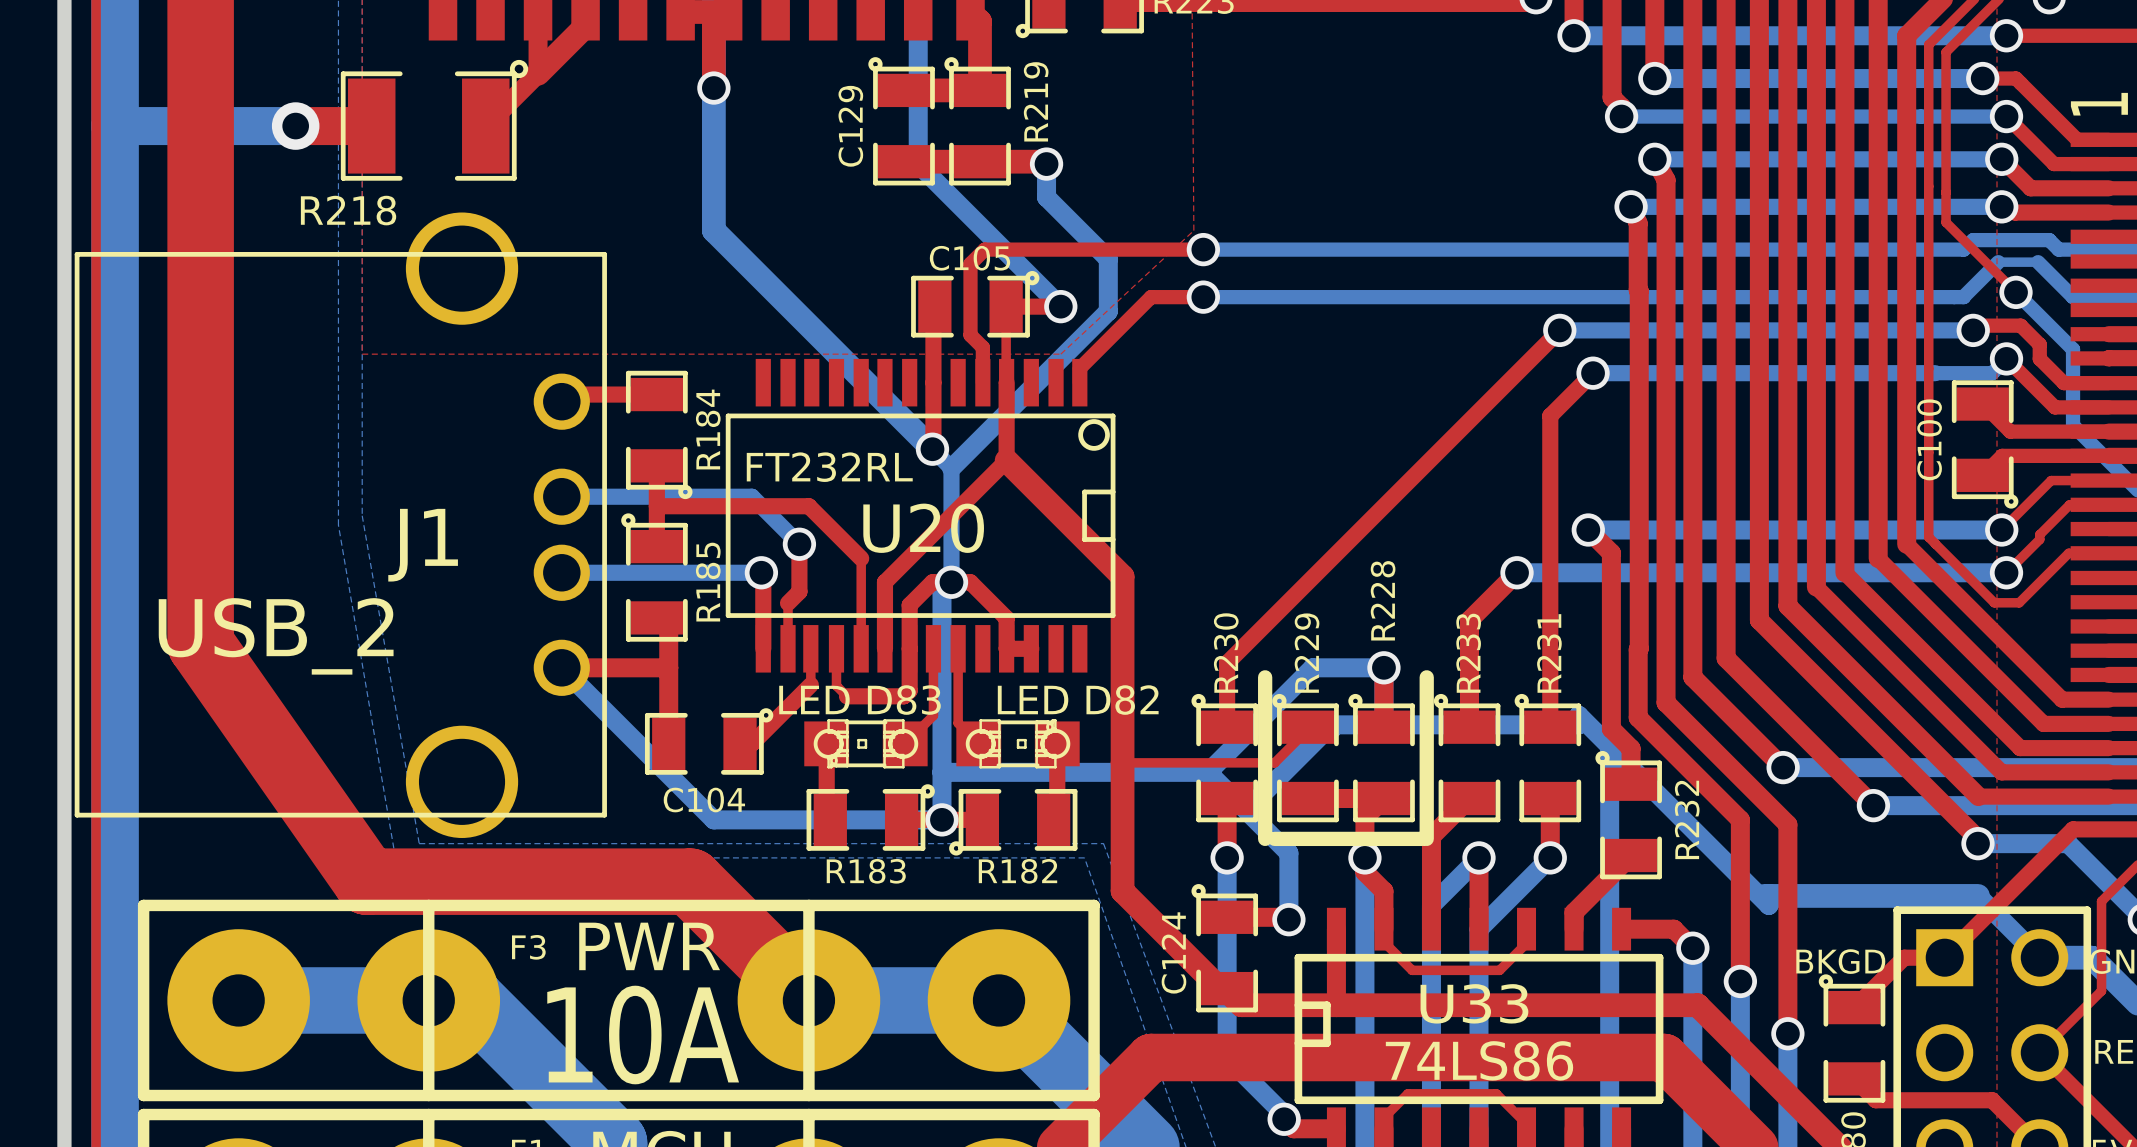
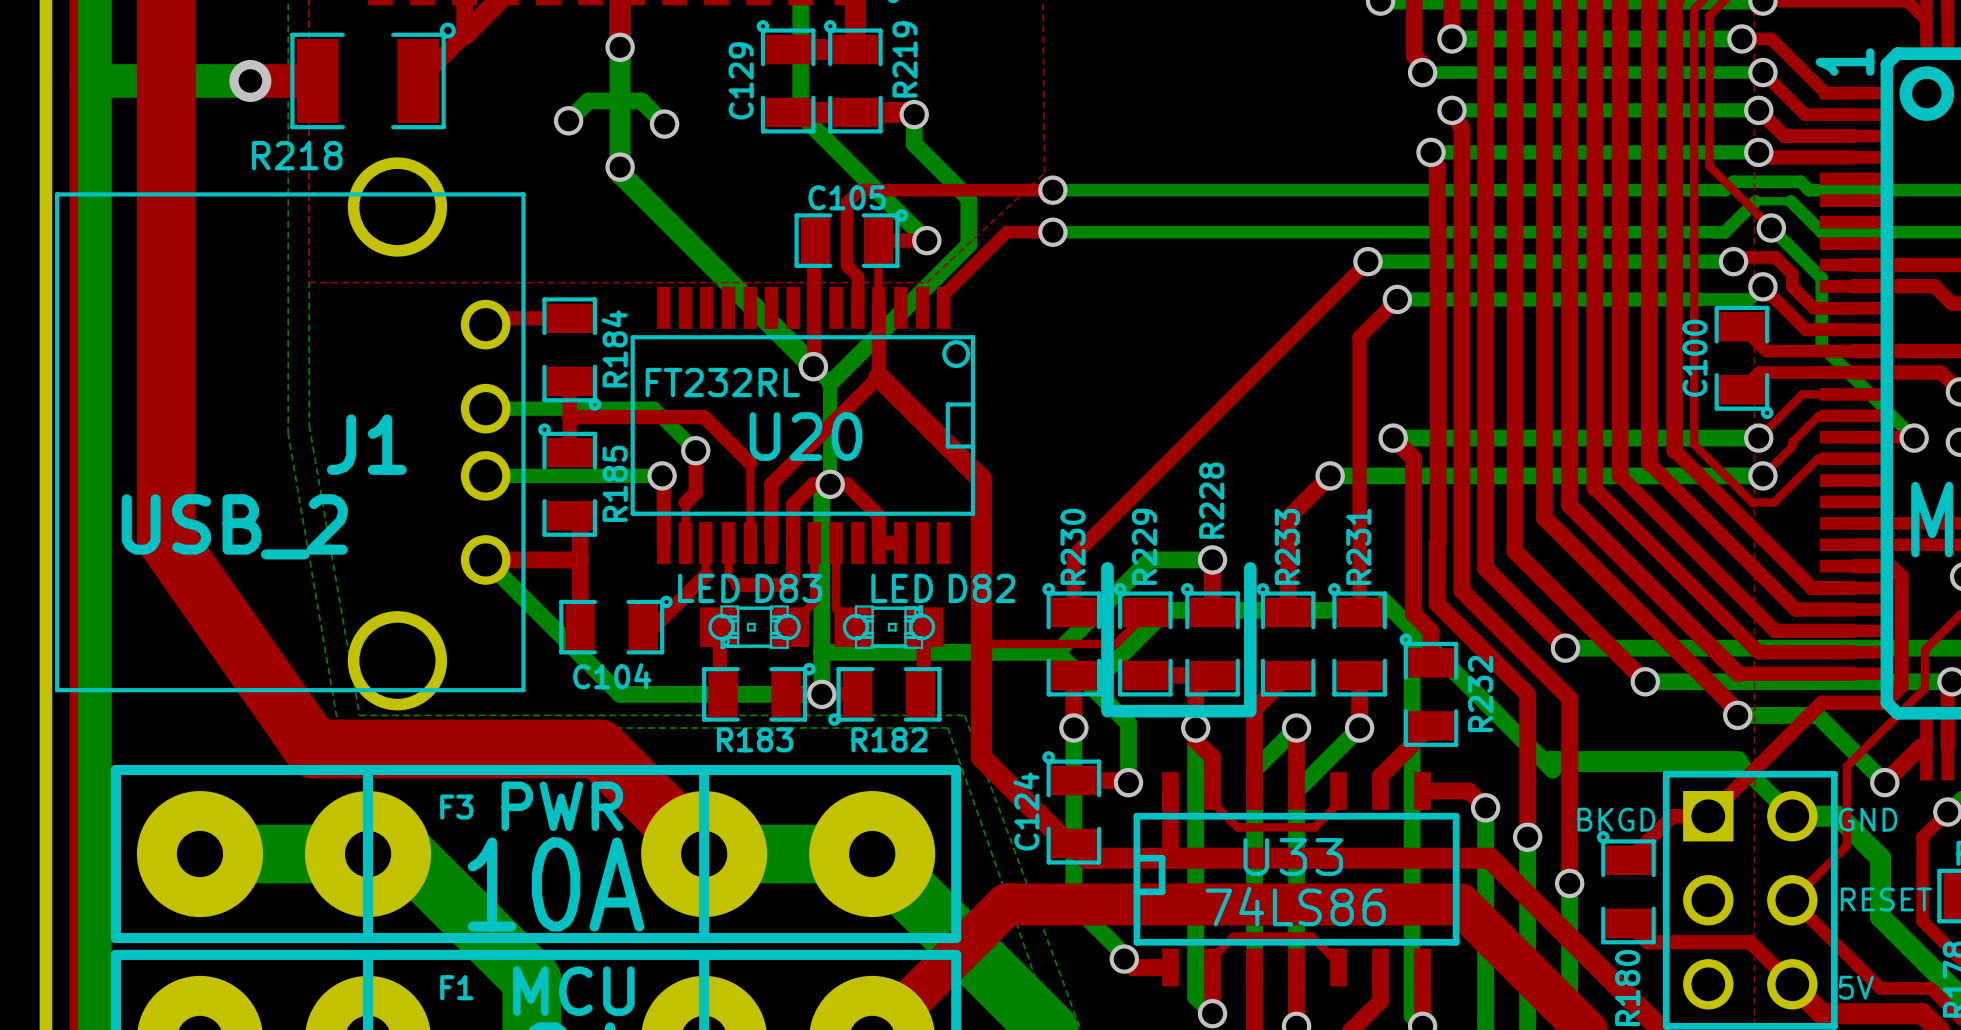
bottom track: none -> (568, 120) (588, 100) (641, 100) (664, 124)
via: none -> (568, 120)
via: none -> (664, 124)
via: none -> (620, 167)

